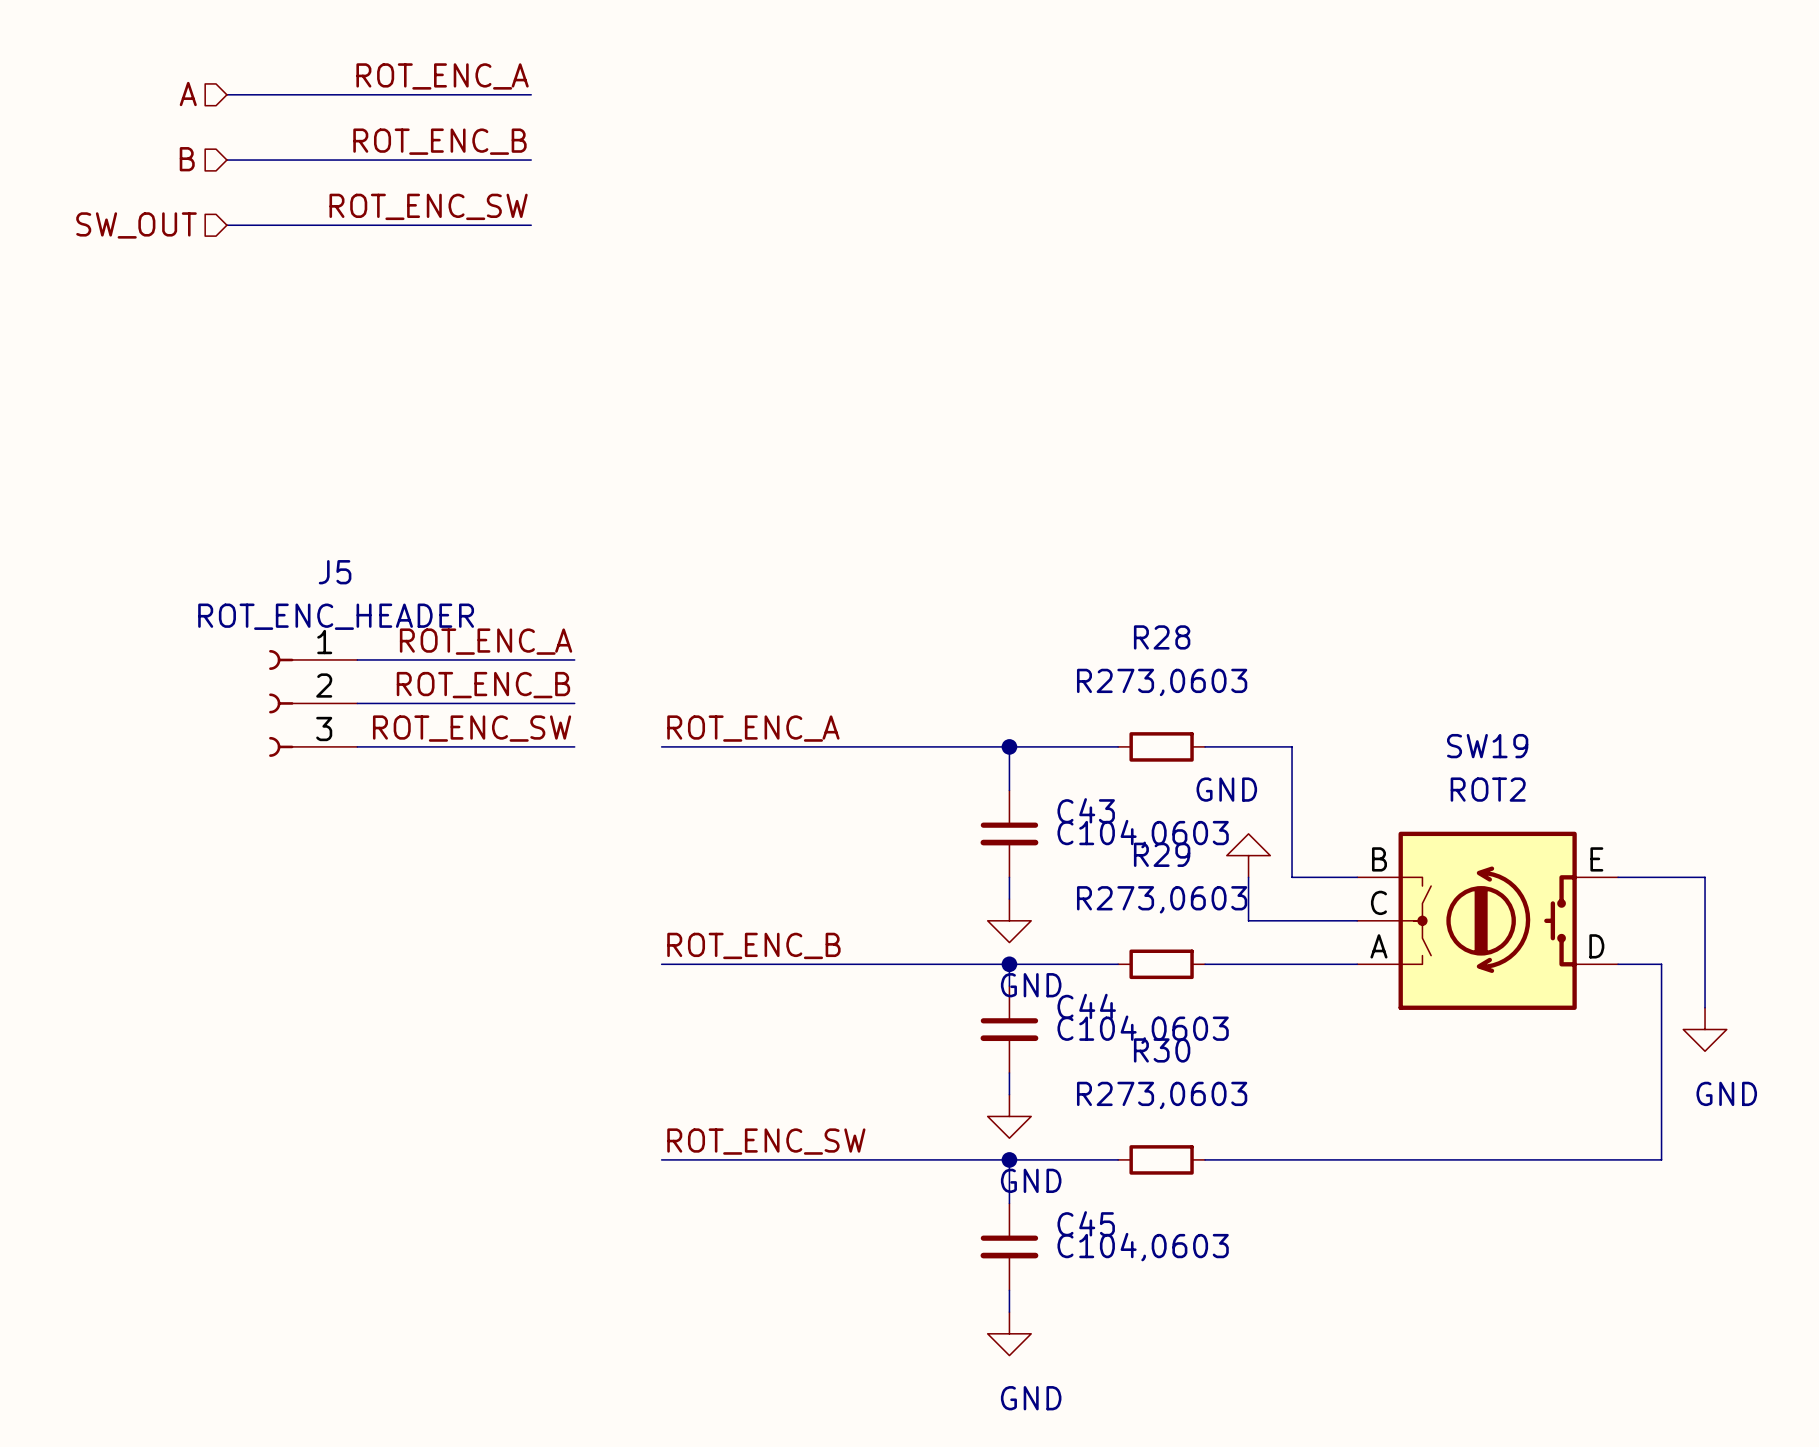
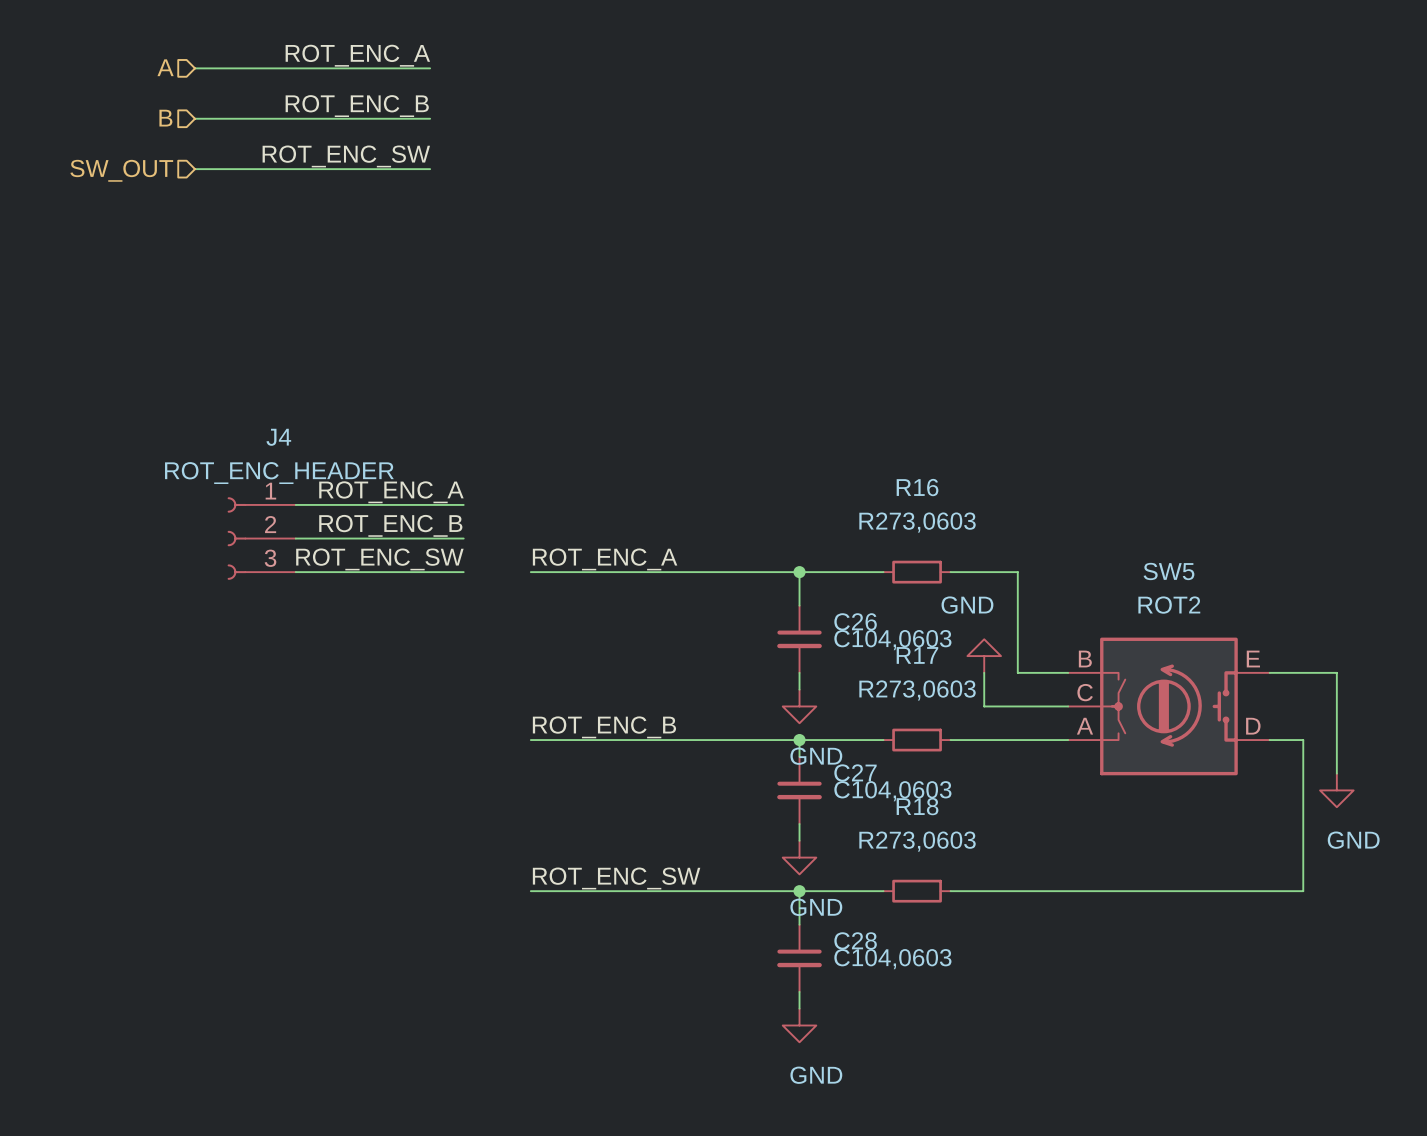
J5 name: J5 (335, 572) -> J4 (278, 437)
R28 name: R28 (1162, 637) -> R16 (917, 487)
SW19 name: SW19 (1487, 746) -> SW5 (1168, 571)
C43 name: C43 (1086, 810) -> C26 (855, 621)
R29 name: R29 (1162, 854) -> R17 (917, 655)
C44 name: C44 (1086, 1006) -> C27 (855, 772)
R30 name: R30 (1162, 1050) -> R18 (917, 806)
C45 name: C45 (1086, 1223) -> C28 (855, 940)

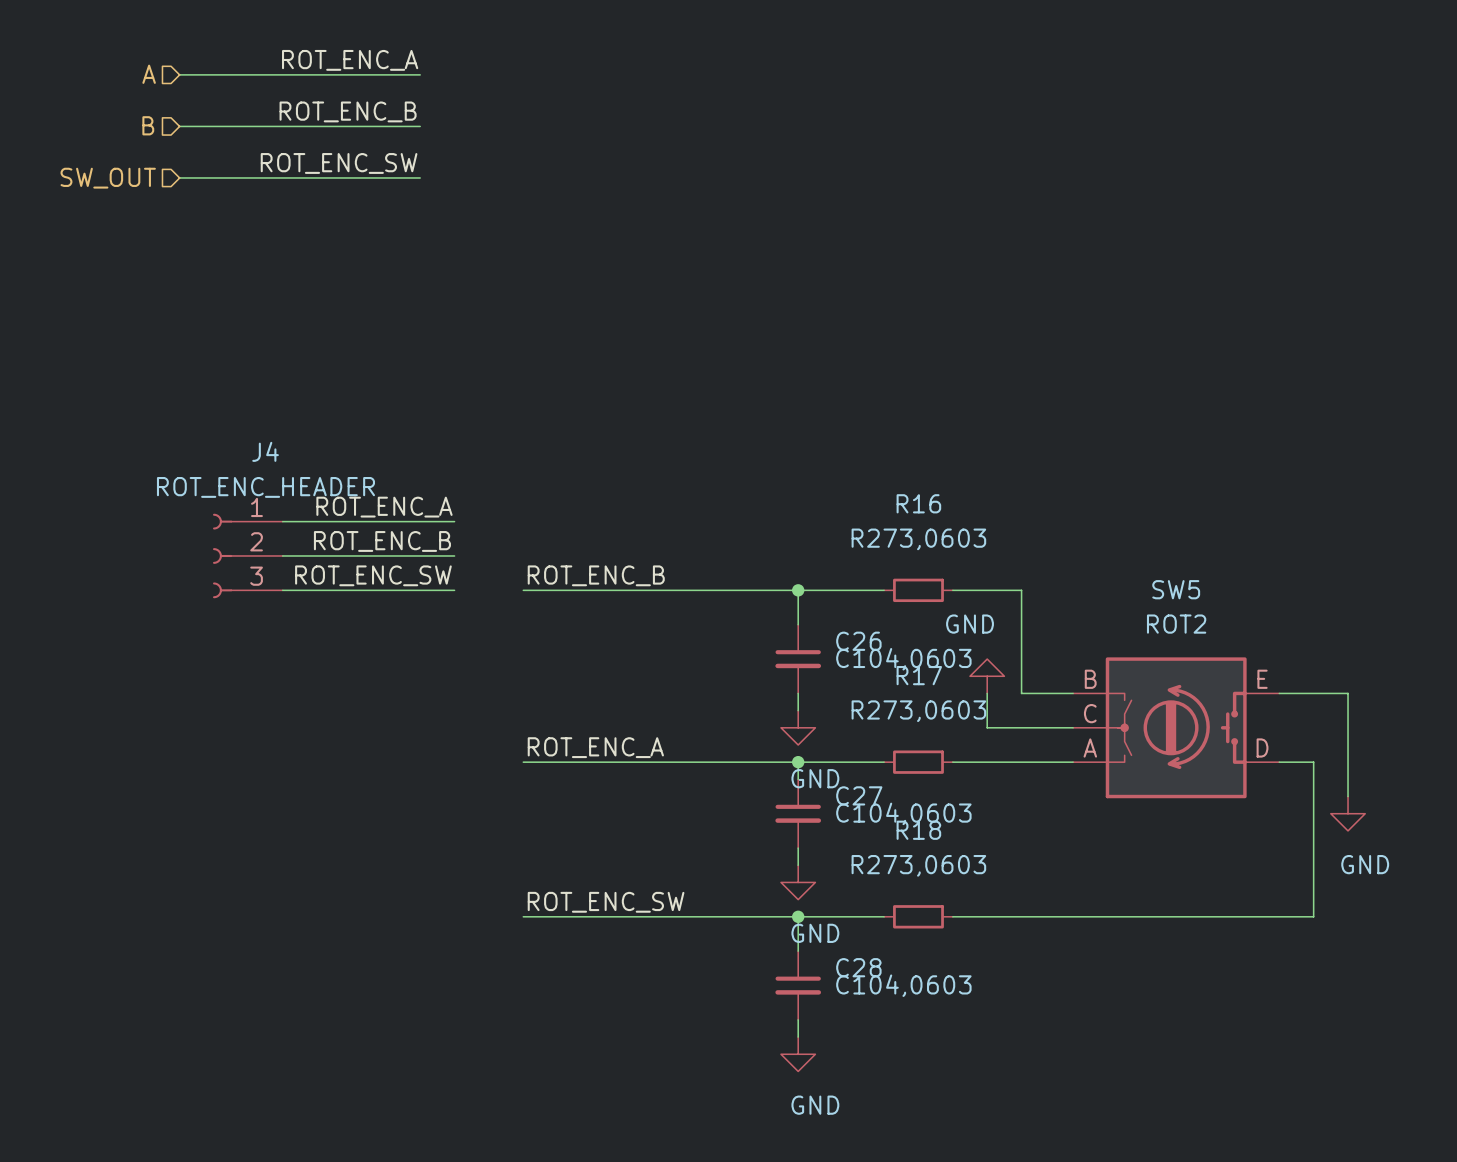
label: ROT_ENC_A (605, 559) -> ROT_ENC_B (596, 575)
label: ROT_ENC_B (604, 727) -> ROT_ENC_A (595, 747)

